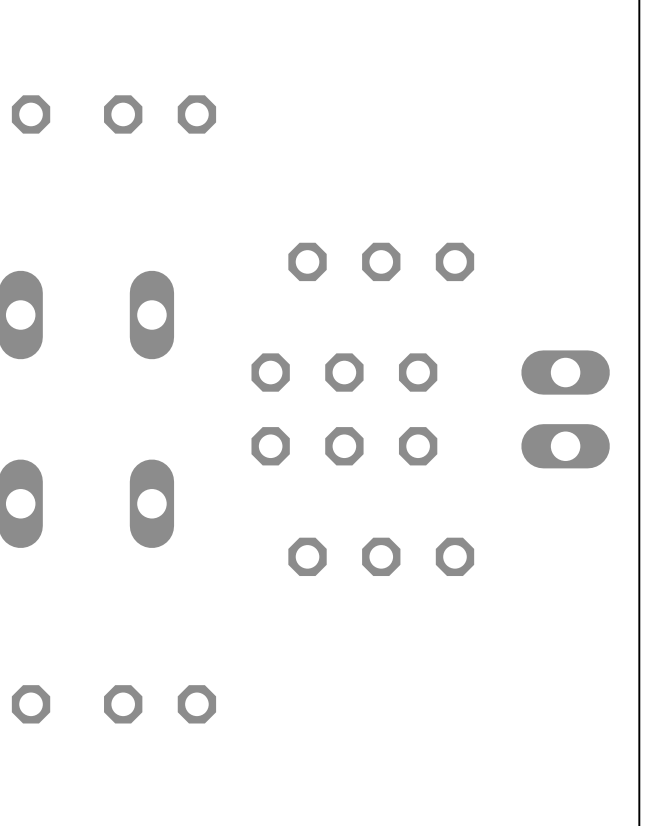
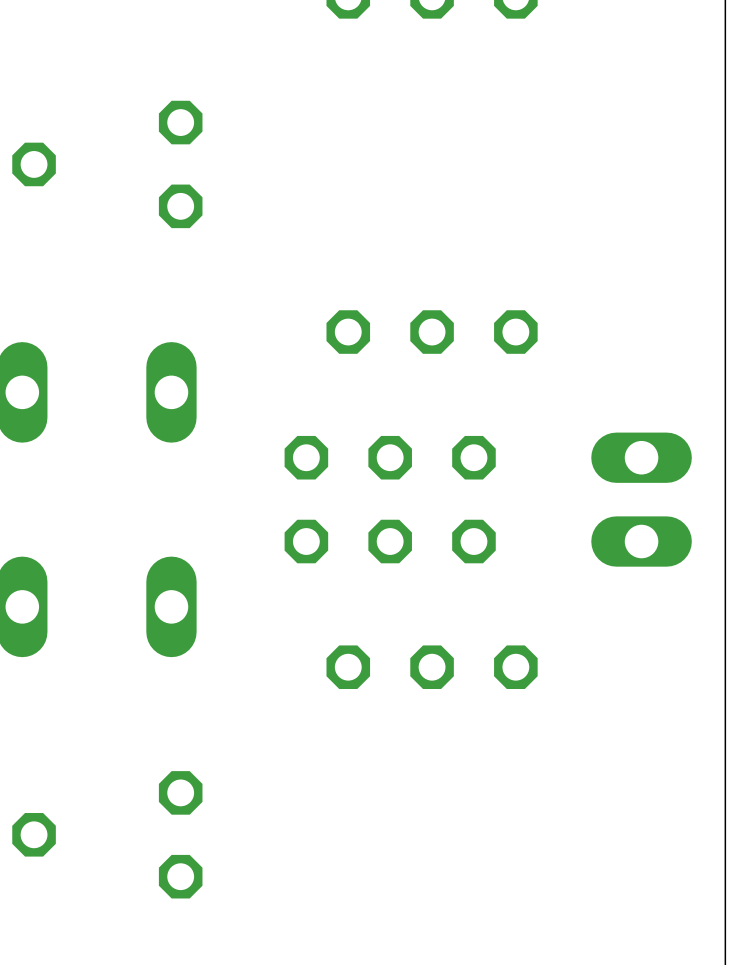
part rotation: 0° (160, 114) -> 90° clockwise (180, 164)
part rotation: 0° (160, 704) -> 90° clockwise (180, 834)

